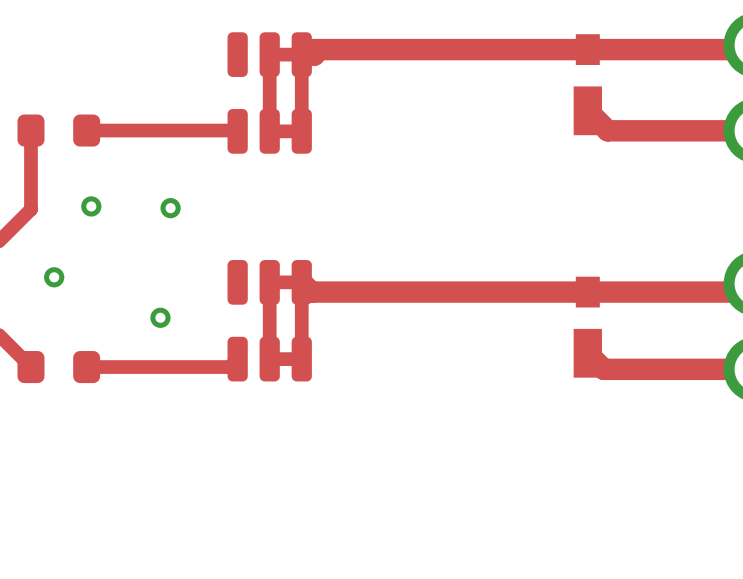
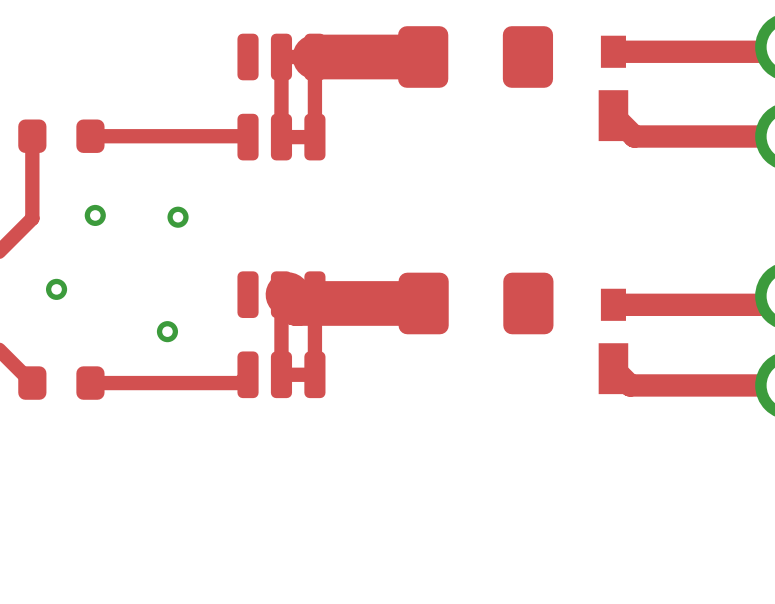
top track: (587, 49) (306, 49) (301, 54) -> (423, 56) (314, 56)
part: none -> (475, 56)
top track: none -> (287, 294) (296, 303) (423, 303)
top track: (301, 282) (311, 292) (587, 292) -> none
part: none -> (476, 303)

